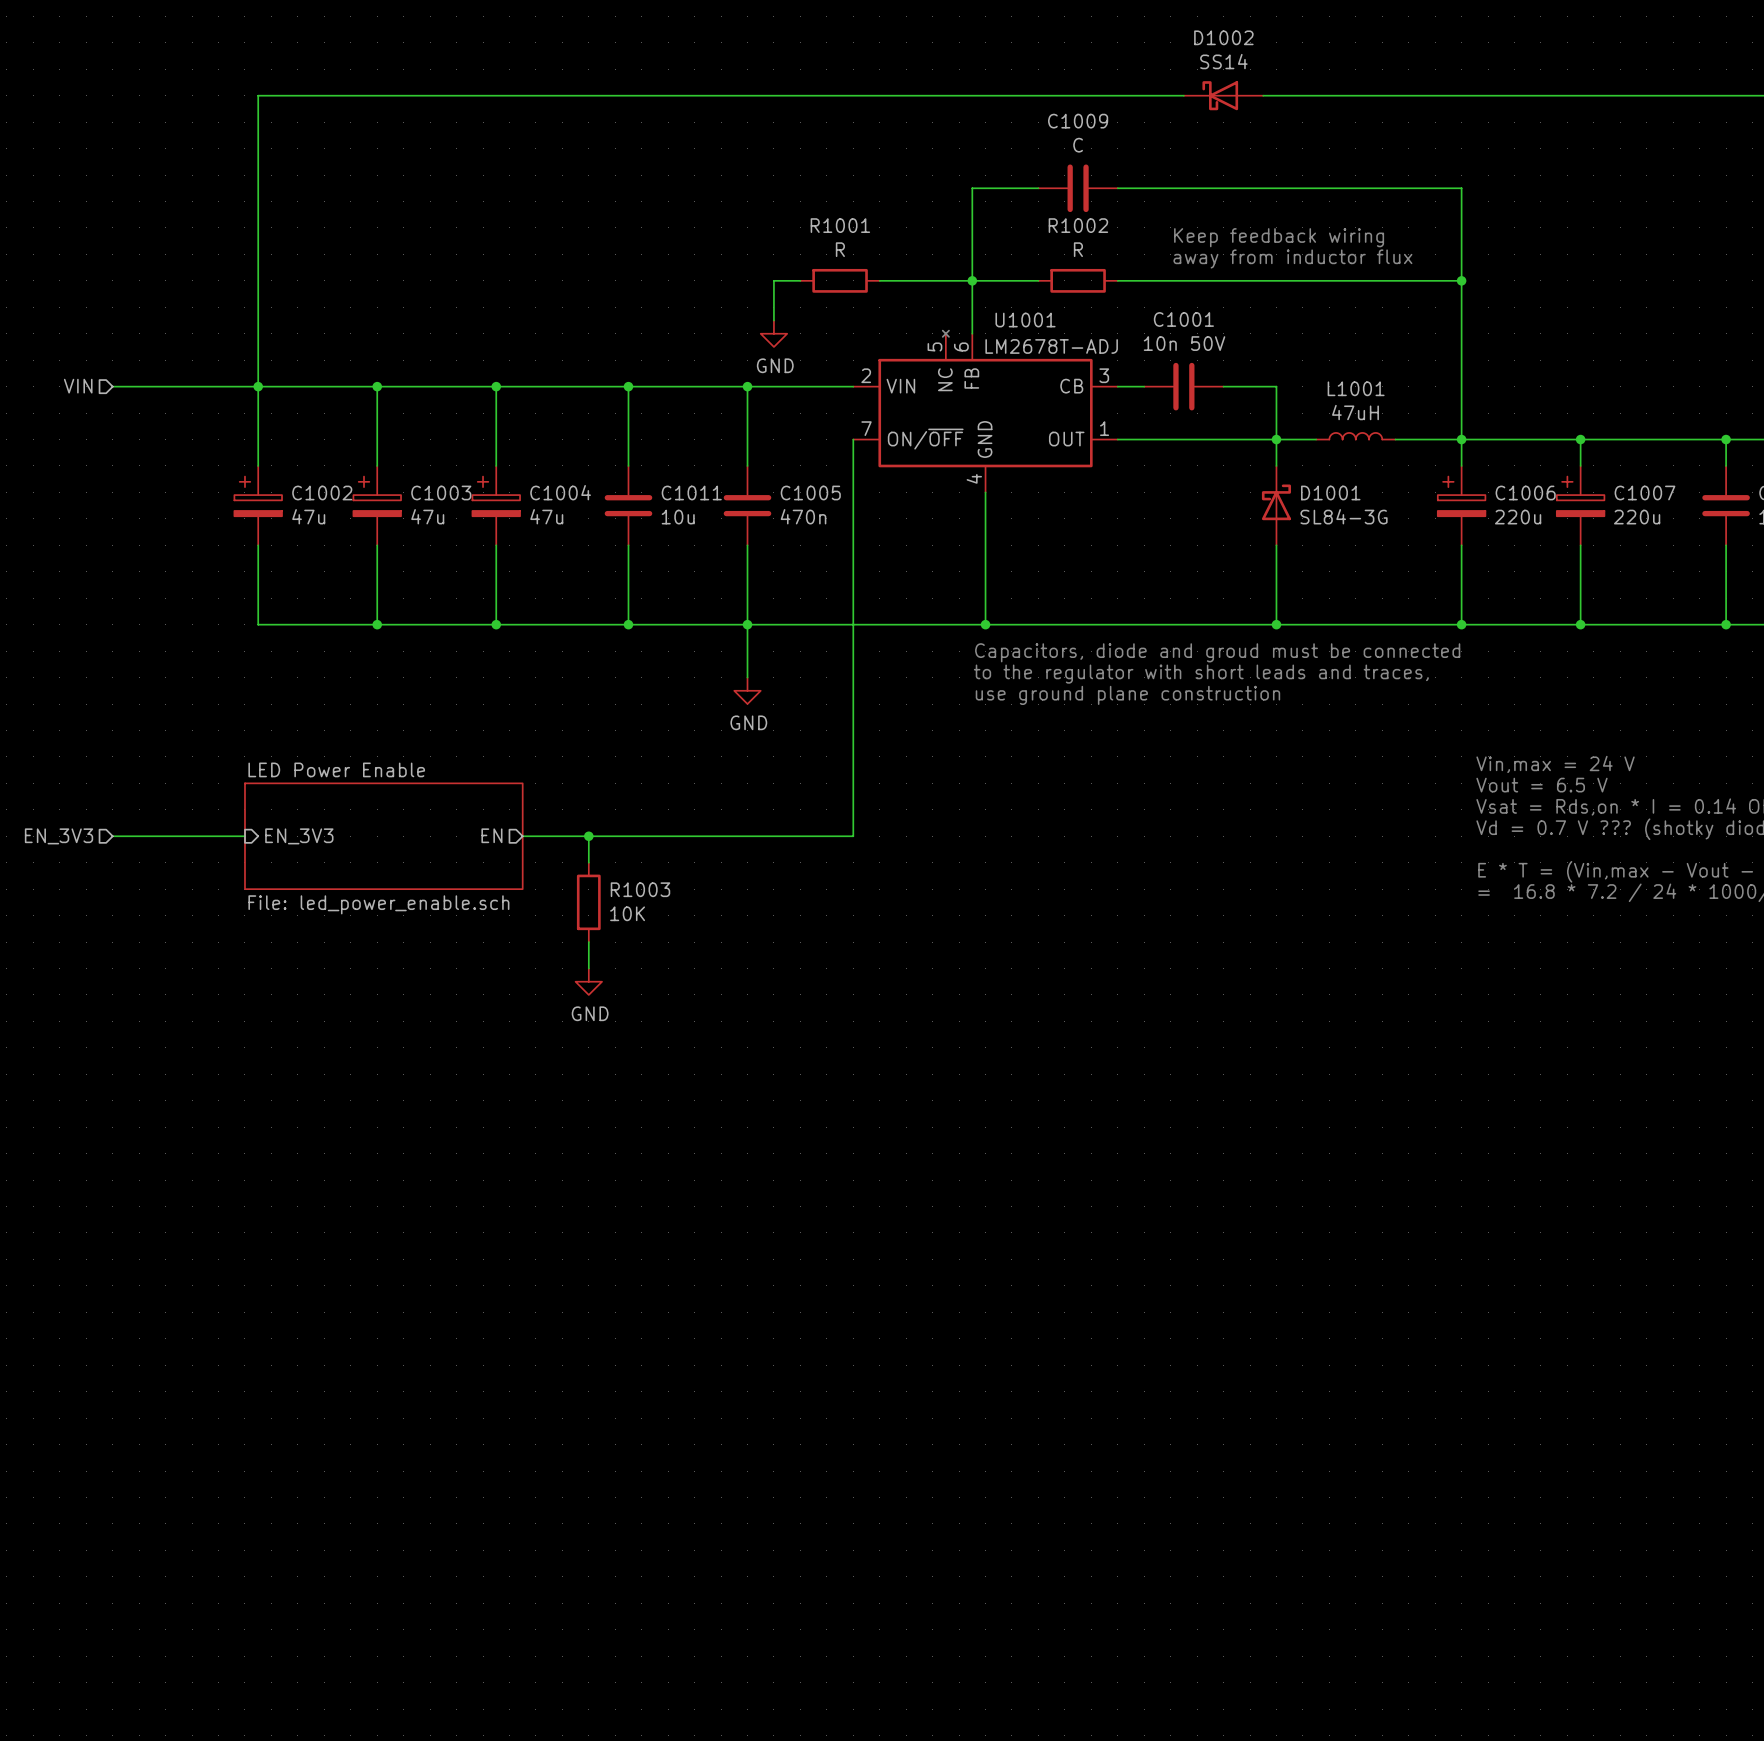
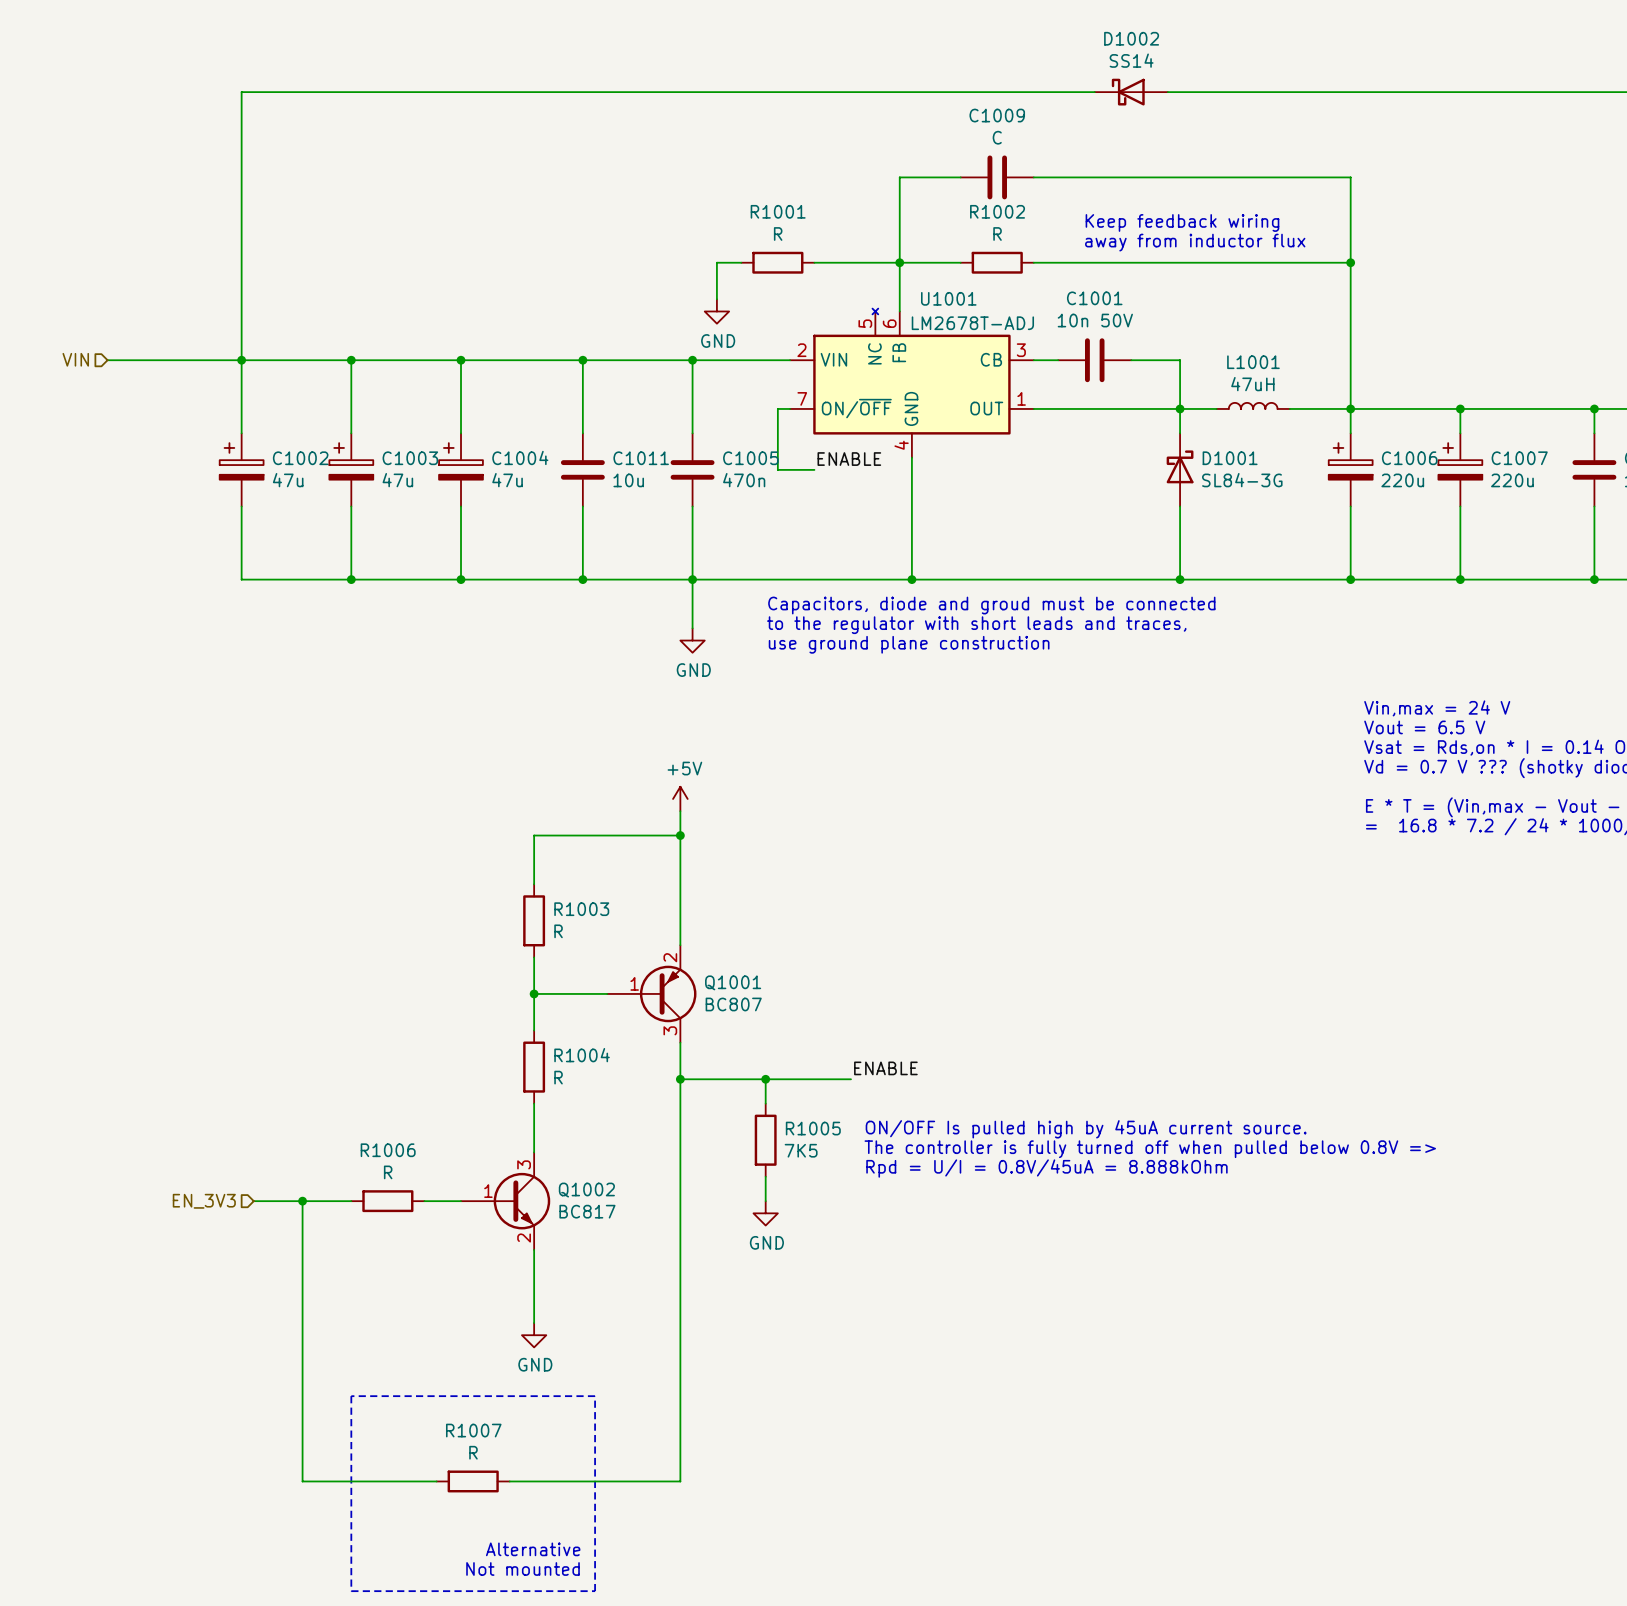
wire: (853, 439) (853, 836) (522, 836) -> (790, 408) (777, 408) (777, 469) (814, 469)
label: none -> ENABLE (849, 459)
text position: Capacitors, diode and groud must be connected (1217, 652) -> Capacitors, diode and groud must be connected (991, 605)
text position: to the regulator with short leads and traces, (1201, 674) -> to the regulator with short leads and traces, (976, 625)
text position: use ground plane construction (1127, 695) -> use ground plane construction (909, 644)
sheet pin: EN (491, 835) -> none
hierarchical label: EN_3V3 (59, 836) -> none
wire: (112, 836) (244, 836) -> none
sheet pin: EN_3V3 (299, 836) -> none
sheet LED Power Enable: File: led_power_enable.sch (383, 836) -> none
wire: (588, 836) (588, 862) -> none
junction: (588, 836) -> none
power symbol: none -> +5V (680, 798)
wire: none -> (680, 811) (680, 945)
R1003 position: (588, 902) -> (534, 920)
wire: none -> (680, 835) (534, 835) (534, 884)
junction: none -> (680, 835)
R1003 value: 10K (627, 913) -> R (558, 931)
wire: (588, 942) (588, 968) -> none
power symbol: GND (588, 981) -> none
wire: none -> (534, 957) (534, 1030)
wire: none -> (534, 993) (607, 993)
junction: none -> (534, 993)
Q1001: none -> BC807 (651, 993)
wire: none -> (680, 1042) (680, 1481) (509, 1481)
R1004: none -> R (534, 1067)
label: none -> ENABLE (885, 1068)
wire: none -> (680, 1079) (850, 1079)
junction: none -> (680, 1079)
wire: none -> (765, 1079) (765, 1103)
junction: none -> (765, 1079)
wire: none -> (534, 1103) (534, 1152)
text: none -> ON/OFF Is pulled high by 45uA current source. (1086, 1129)
R1005: none -> 7K5 (765, 1140)
text: none -> The controller is fully turned off when pulled below 0.8V => (1150, 1149)
text: none -> Rpd = U/I = 0.8V/45uA = 8.888kOhm (1046, 1168)
wire: none -> (765, 1176) (765, 1201)
hierarchical label: none -> EN_3V3 (204, 1201)
wire: none -> (253, 1201) (351, 1201)
wire: none -> (302, 1201) (302, 1481) (436, 1481)
junction: none -> (302, 1201)
R1006: none -> R (387, 1201)
wire: none -> (424, 1201) (461, 1201)
Q1002: none -> BC817 (505, 1201)
power symbol: none -> GND (765, 1213)
wire: none -> (534, 1249) (534, 1323)
power symbol: none -> GND (534, 1335)
line: none -> (351, 1396) (351, 1591) (595, 1591) (595, 1396) (351, 1396)
R1007: none -> R (473, 1481)
text: none -> Alternative (533, 1549)
text: none -> Not mounted (523, 1568)

